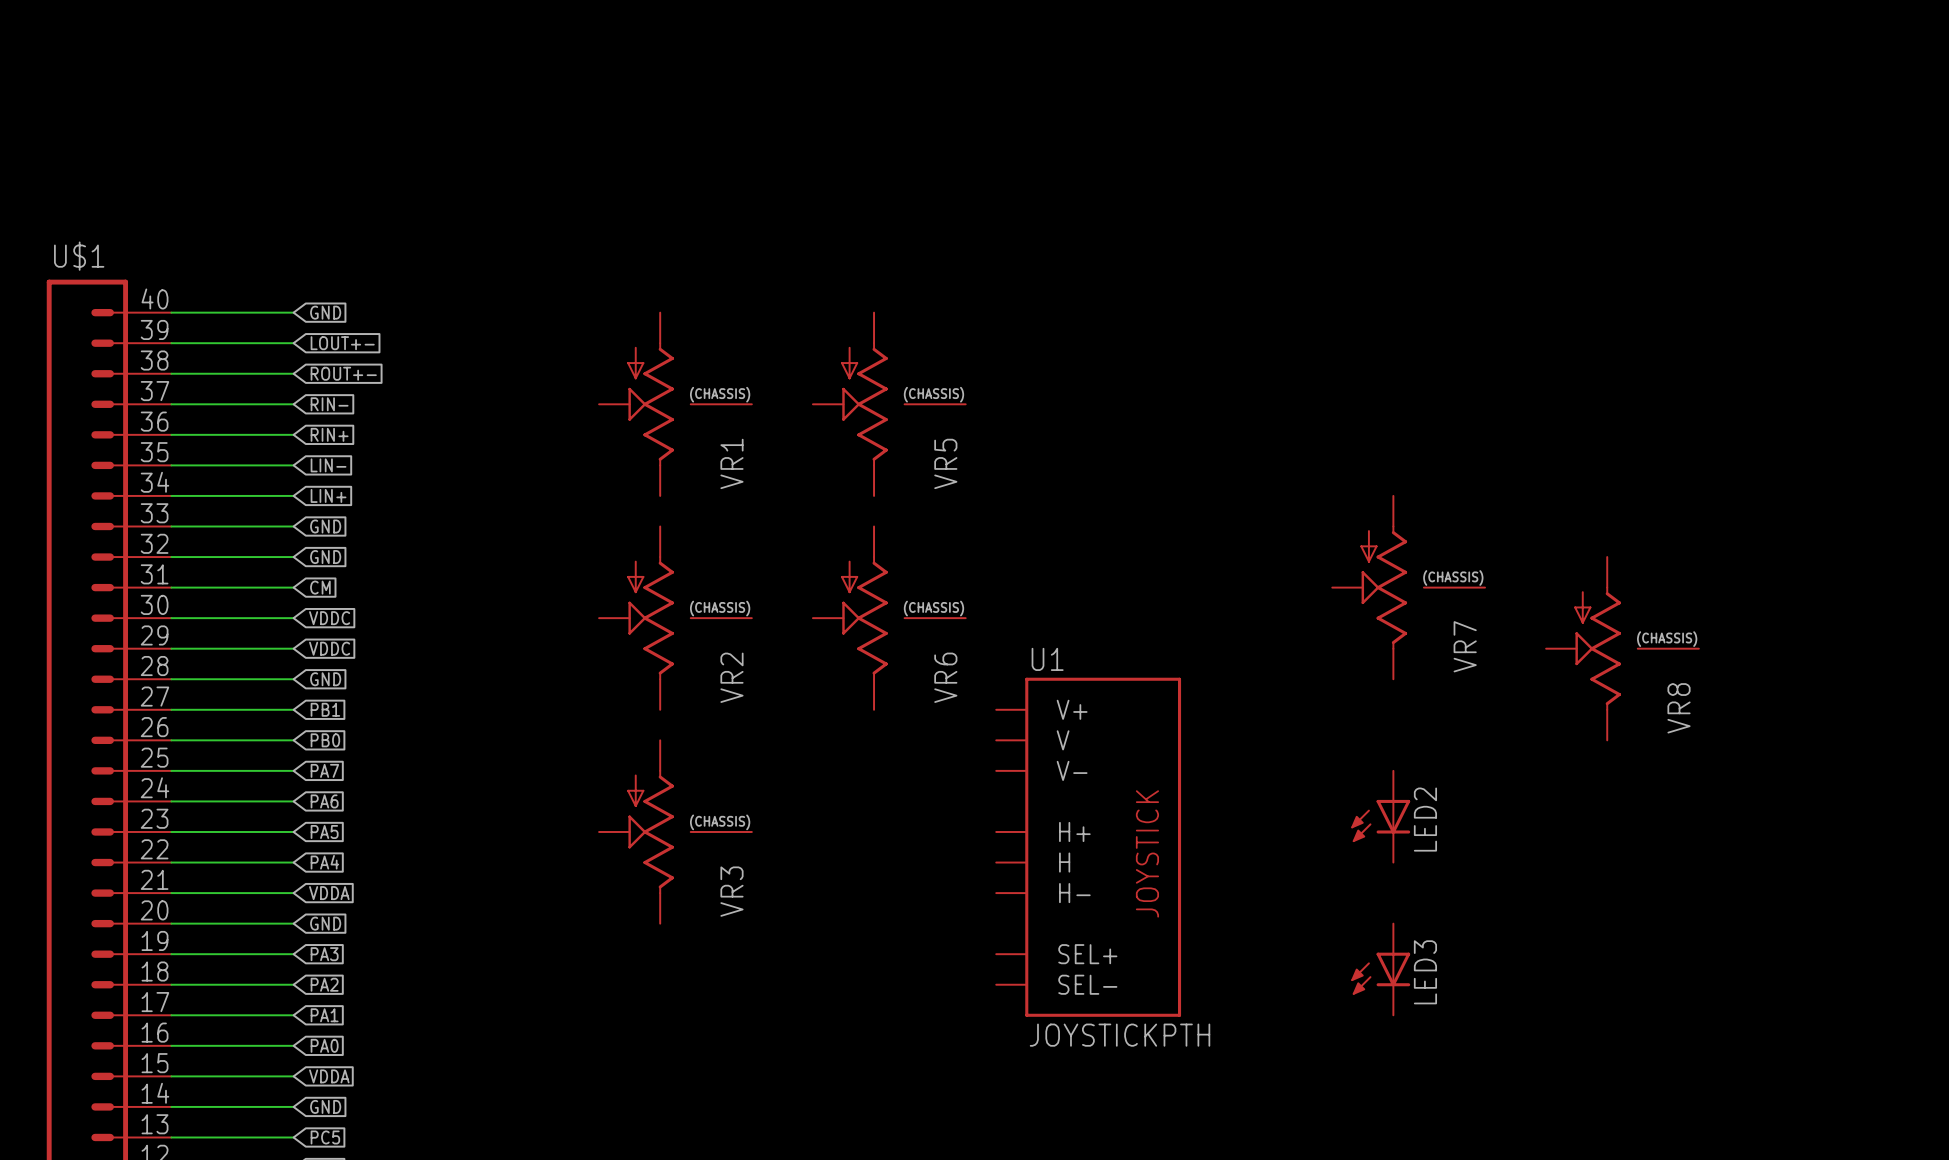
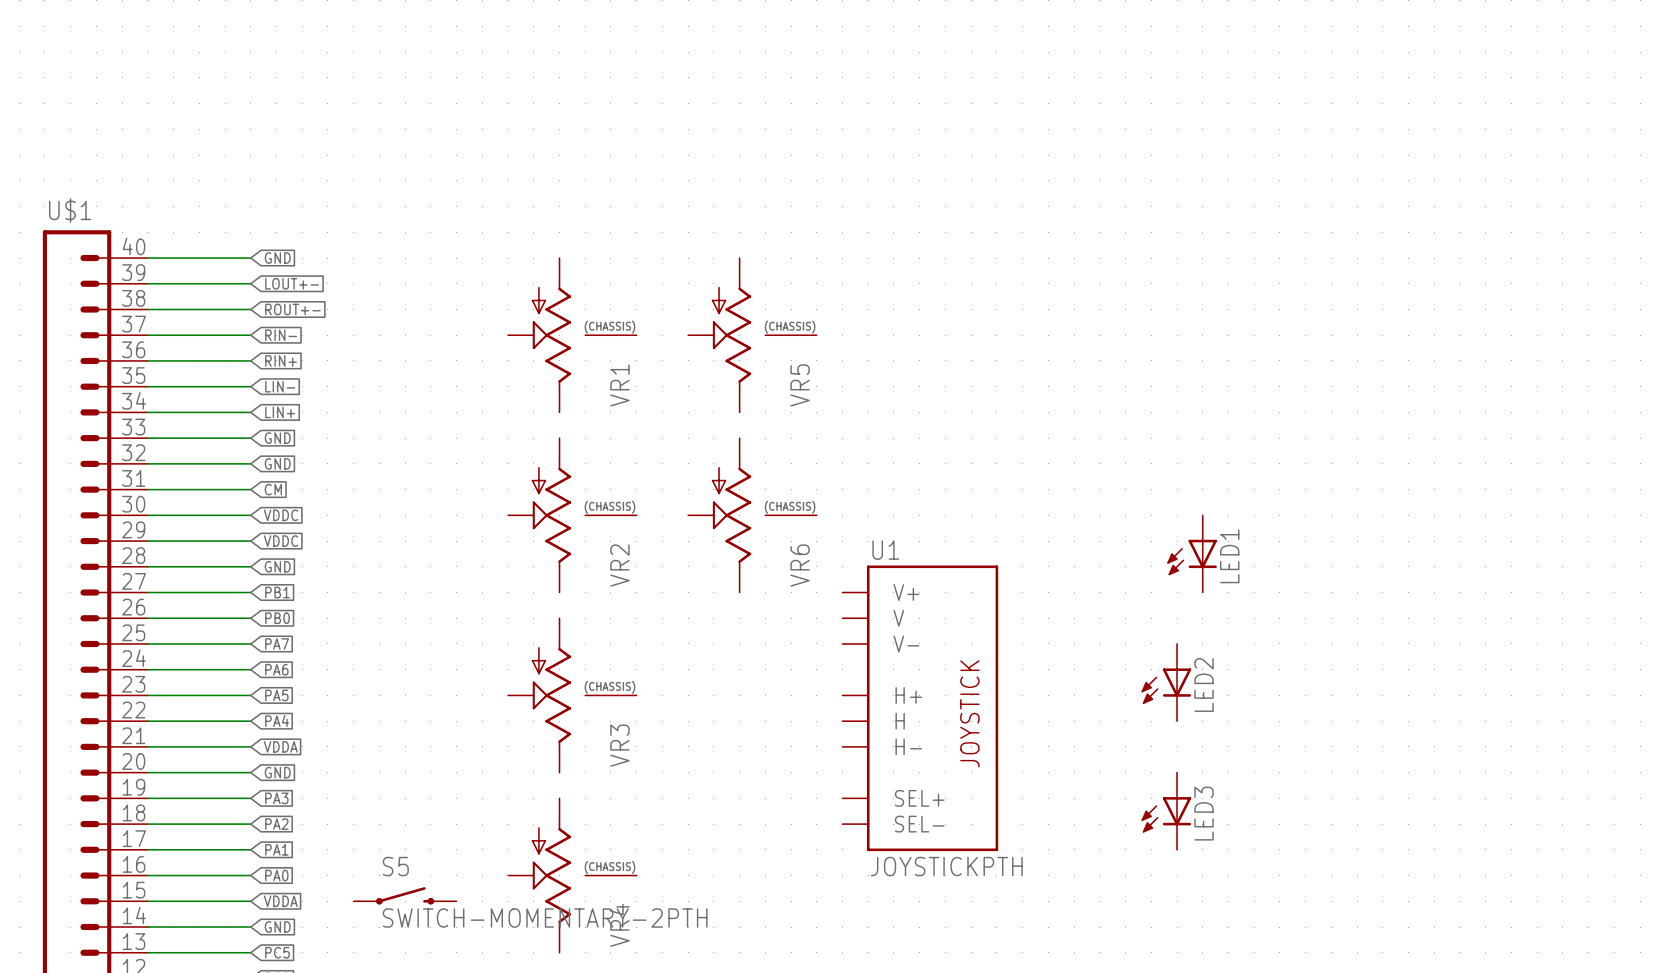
VR7: (1408, 587) -> none
VR8: (1622, 648) -> none
LED1: none -> (1192, 553)
VR4: none -> (572, 875)
S5: none -> SWITCH-MOMENTARY-2PTH (405, 895)

